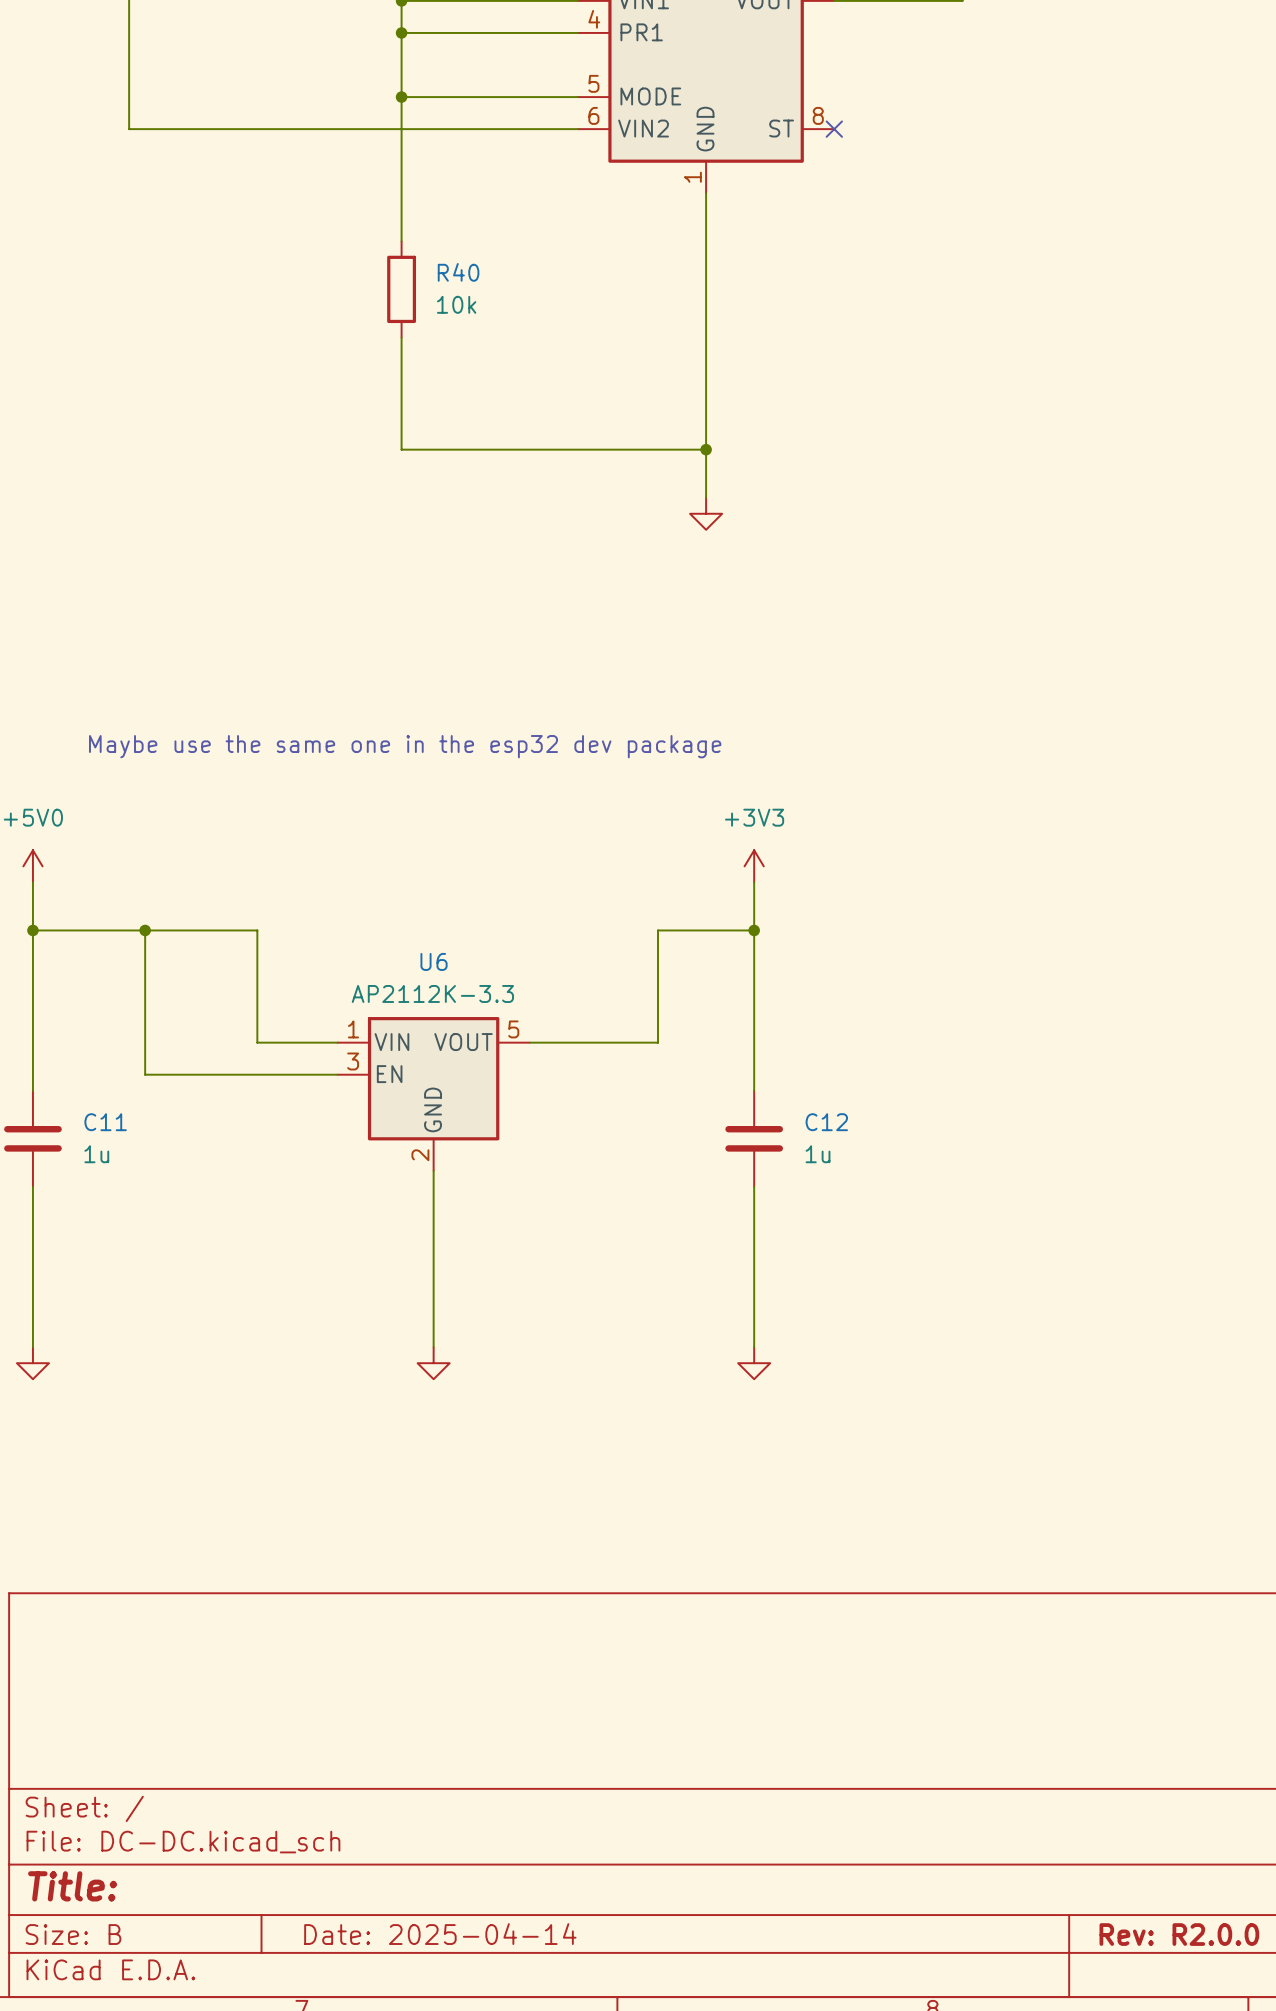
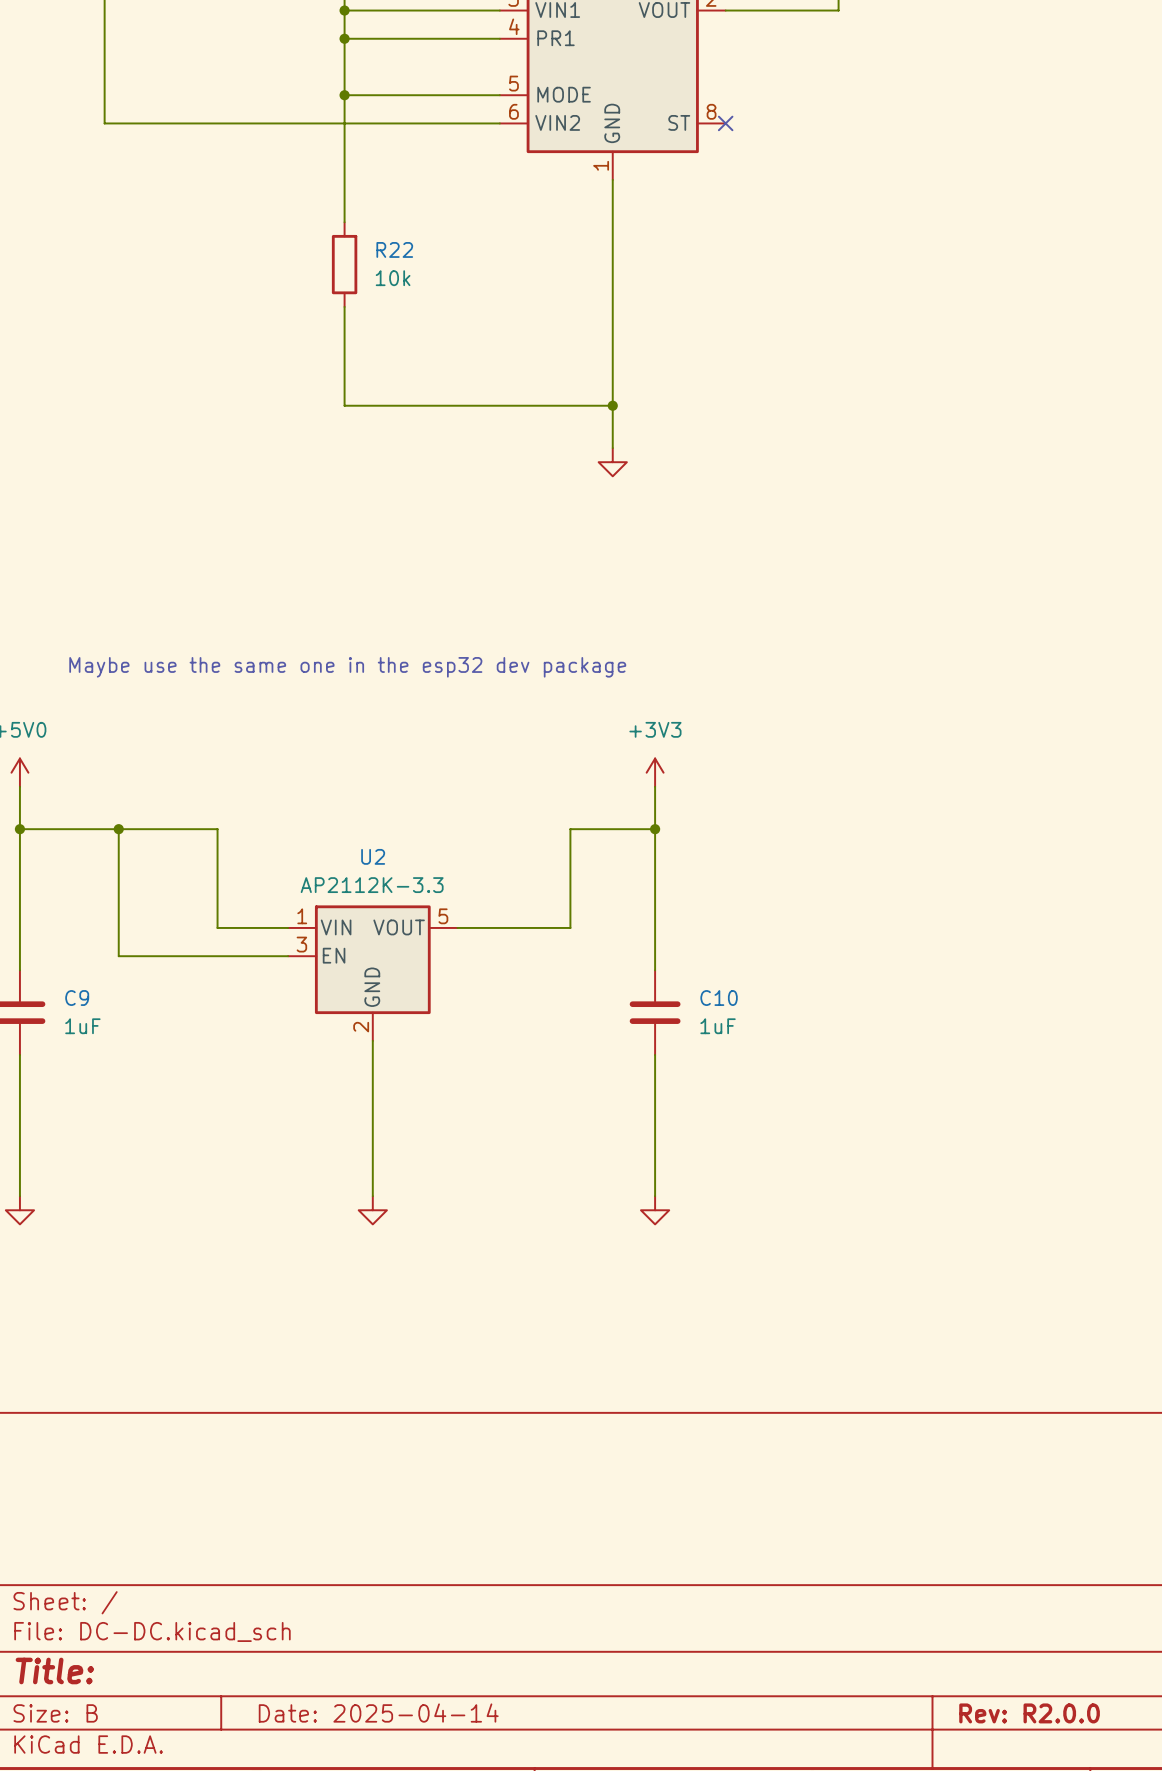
R40 name: R40 (458, 272) -> R22 (394, 249)
U6 name: U6 (434, 961) -> U2 (373, 856)
C11 name: C11 (105, 1122) -> C9 (77, 998)
C12 name: C12 (826, 1122) -> C10 (719, 998)
C11 value: 1u (96, 1154) -> 1uF (82, 1026)
C12 value: 1u (818, 1154) -> 1uF (718, 1026)

